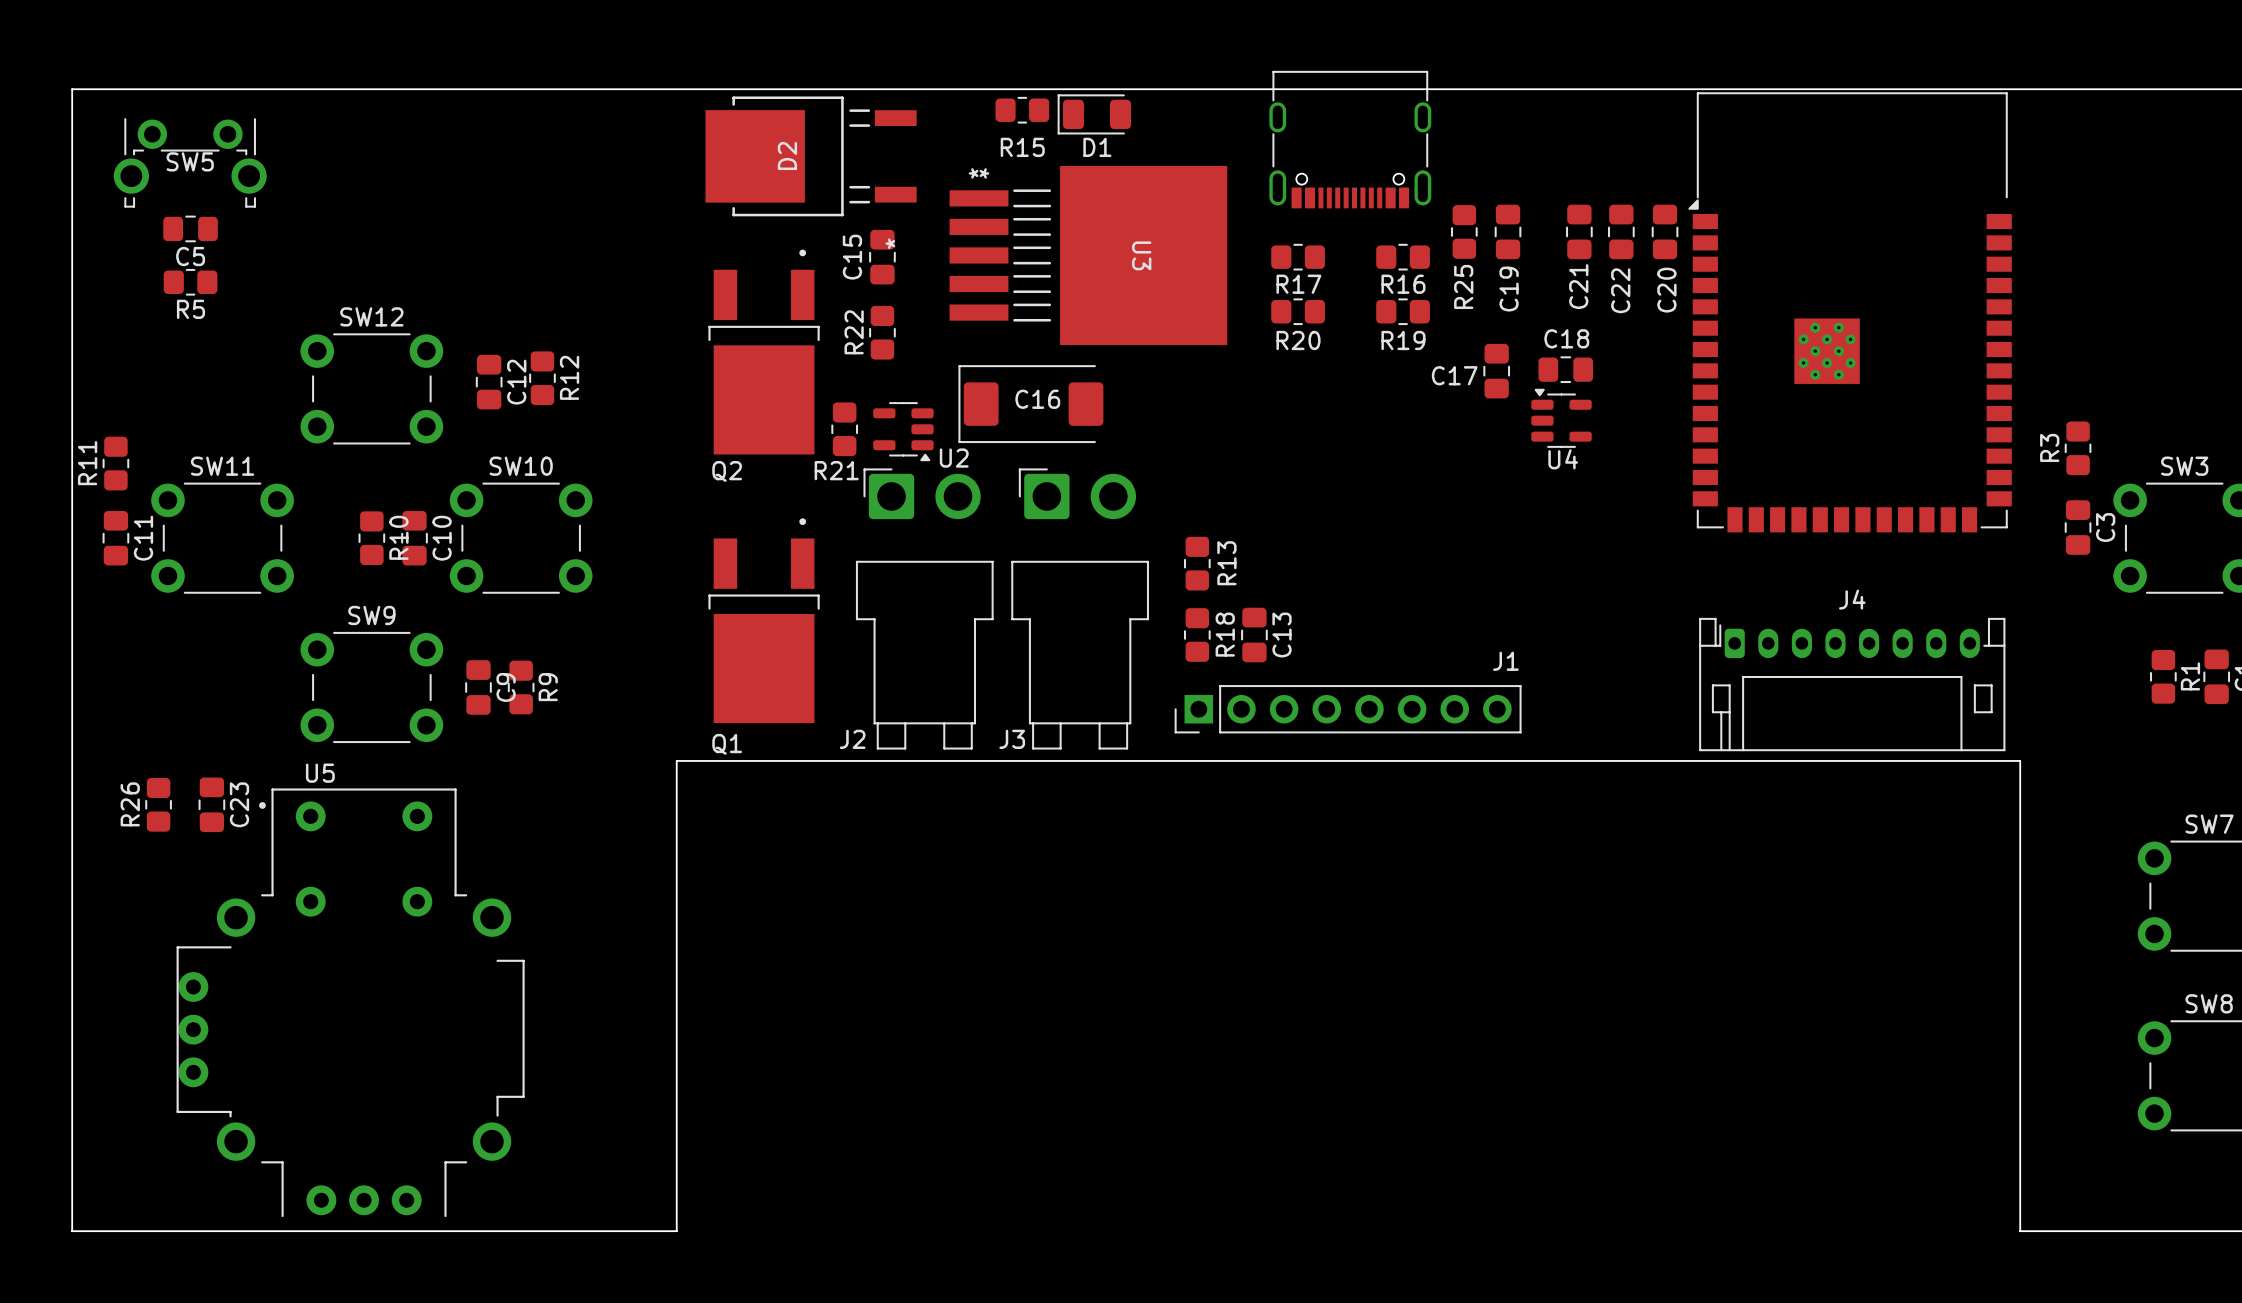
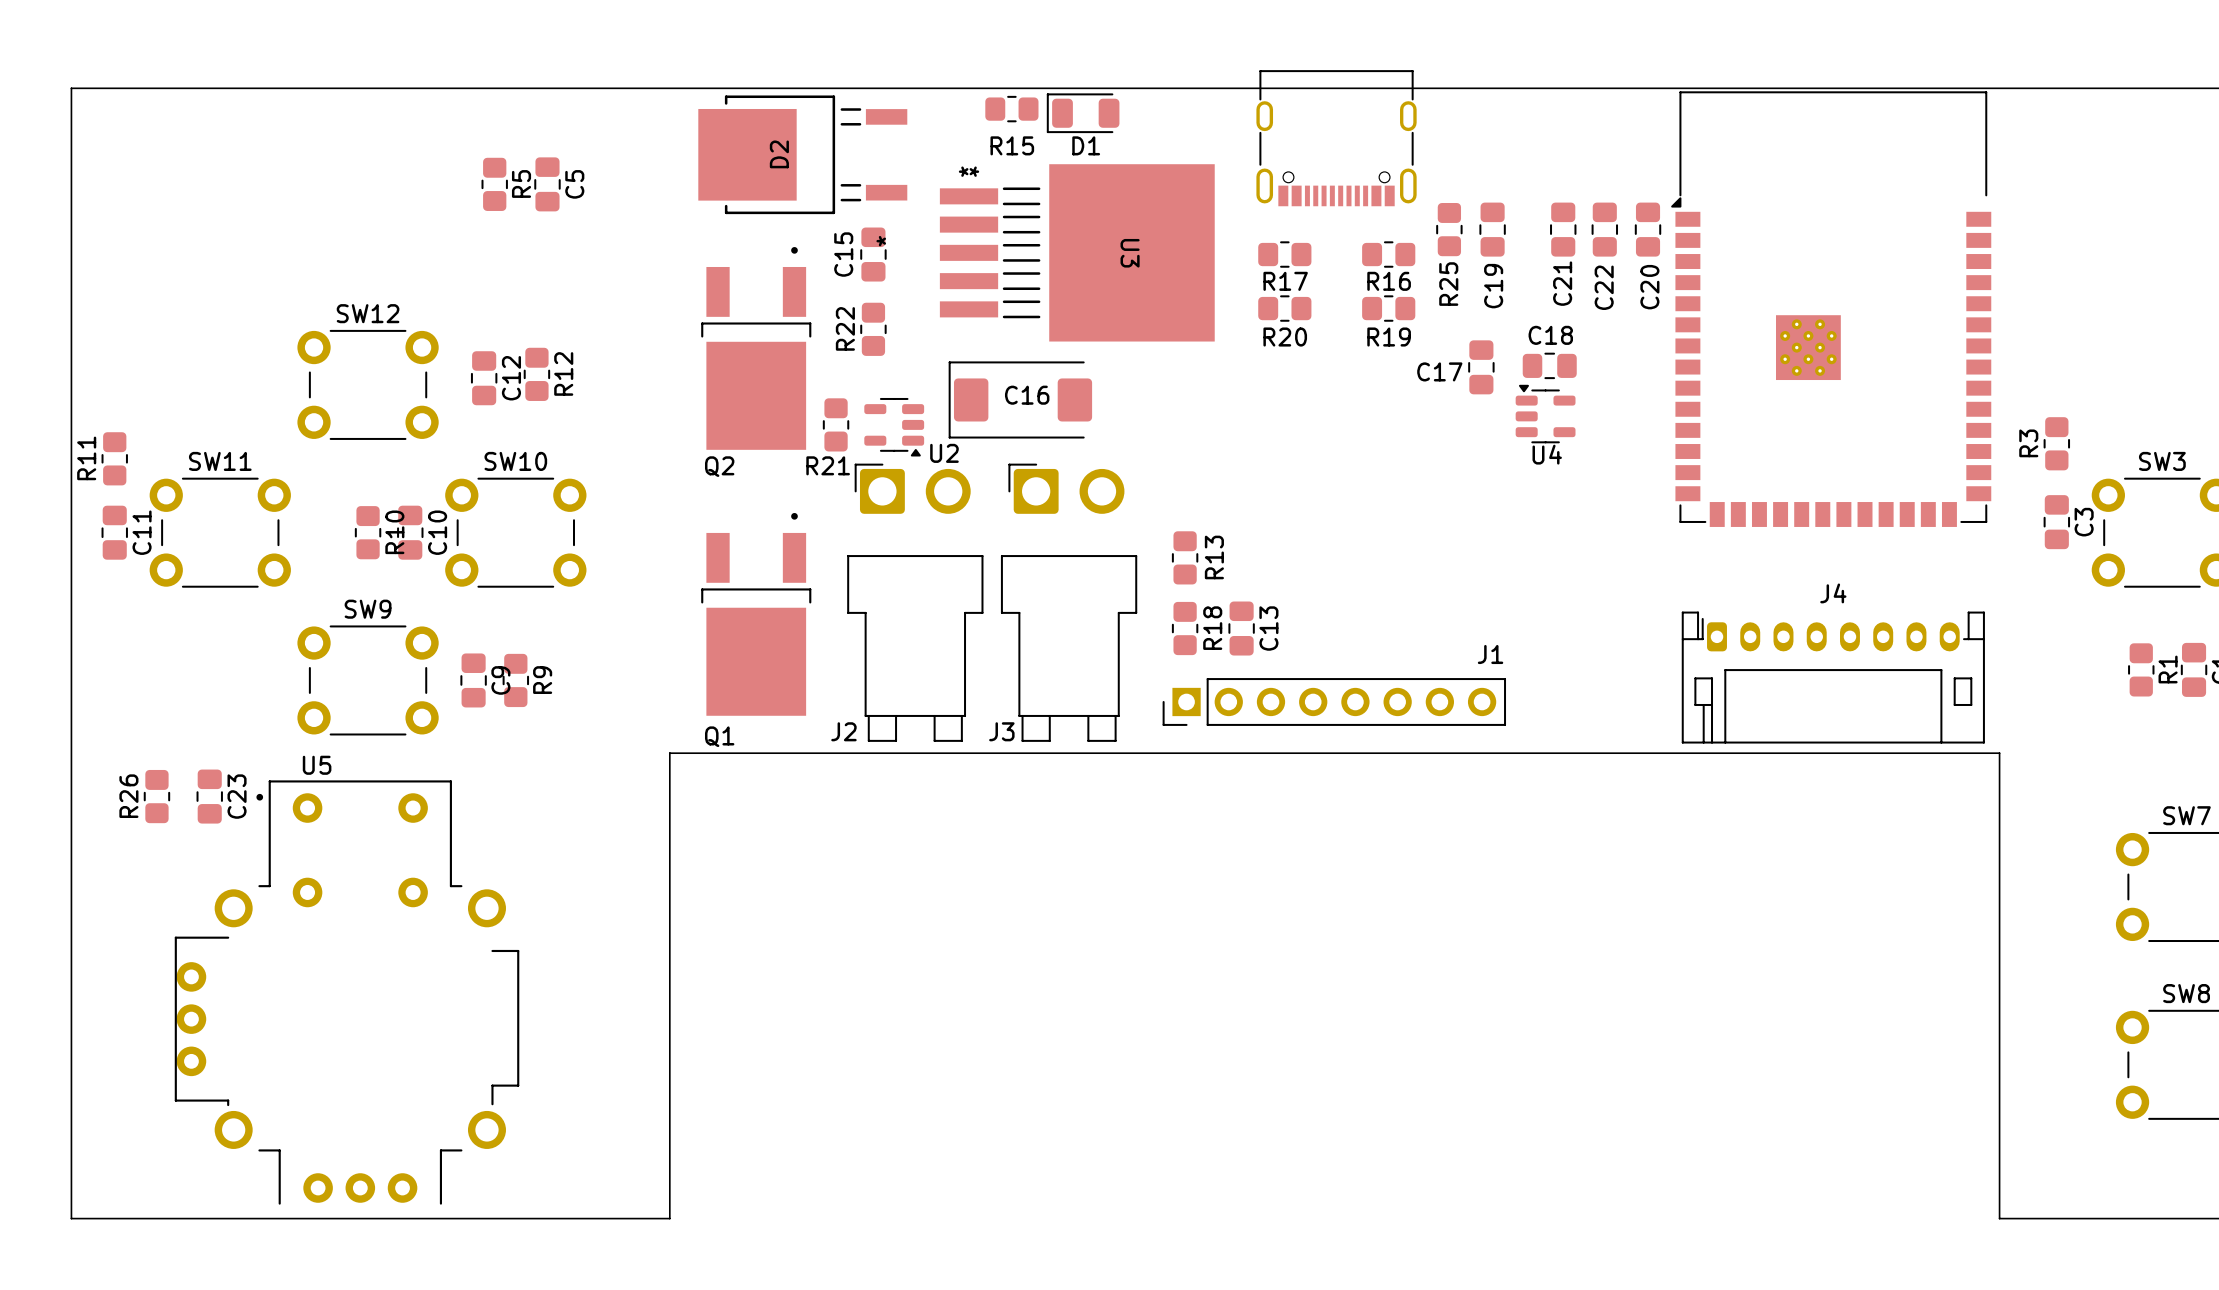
SW5: (190, 162) -> none
C5 rotation: 0° (190, 228) -> 90° clockwise (547, 184)
C5 position: (190, 228) -> (547, 184)
C5 name position: C5 (190, 256) -> C5 (574, 184)
R5 rotation: 0° (190, 282) -> 90° clockwise (494, 184)
R5 position: (190, 282) -> (494, 184)
R5 name position: R5 (190, 309) -> R5 (521, 183)

